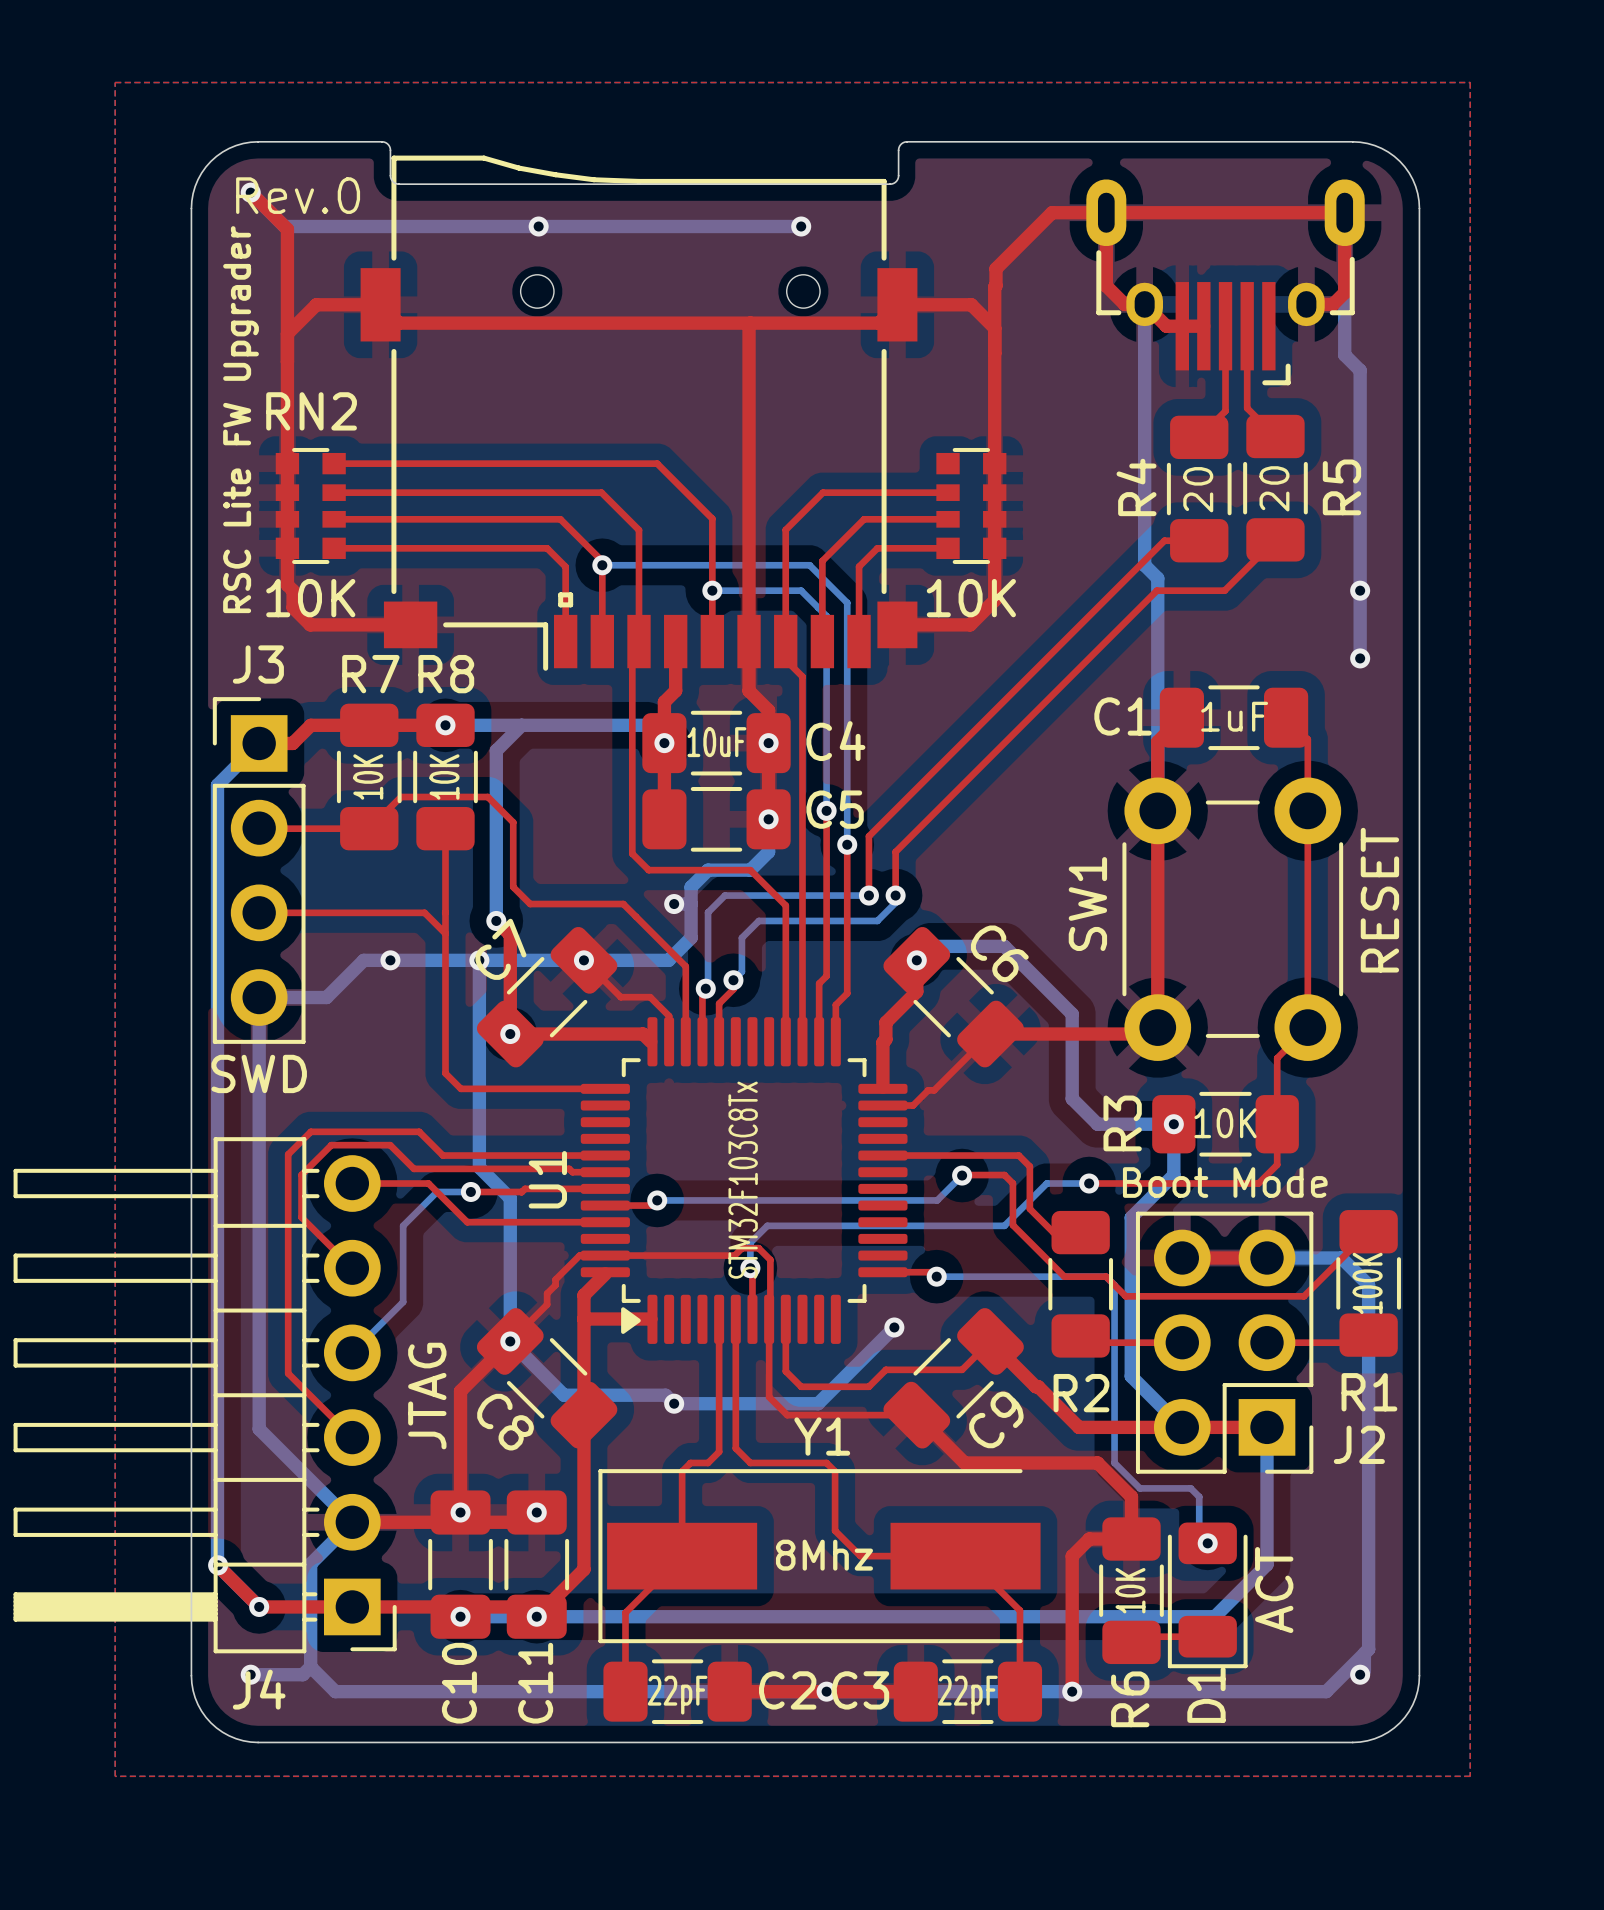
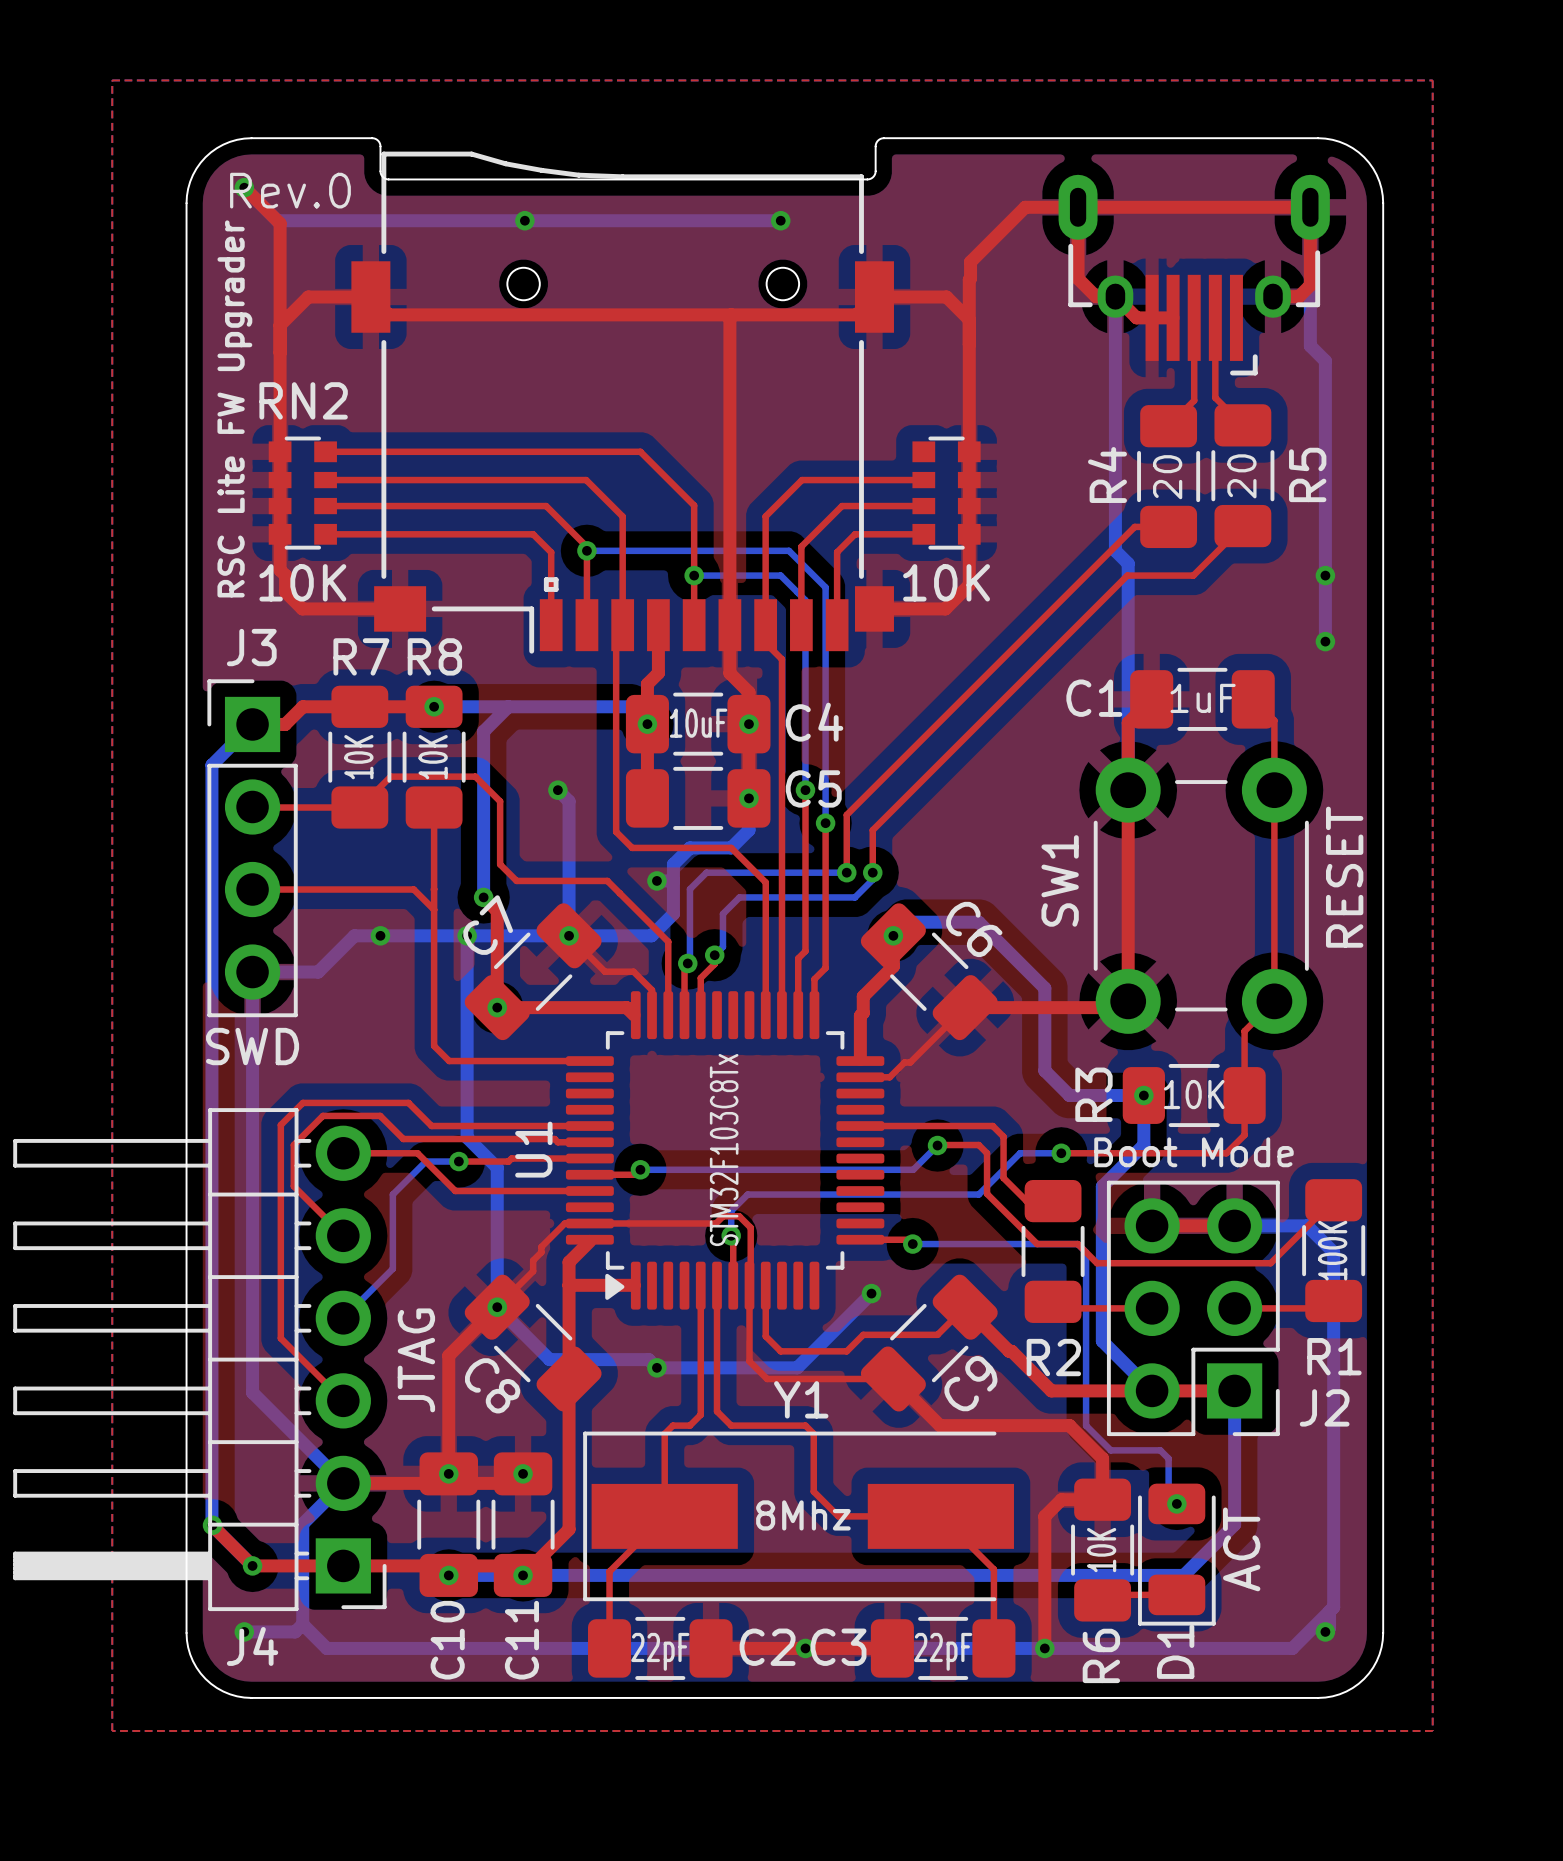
bottom track: none -> (557, 790) (569, 801) (569, 935)
via: none -> (557, 790)

